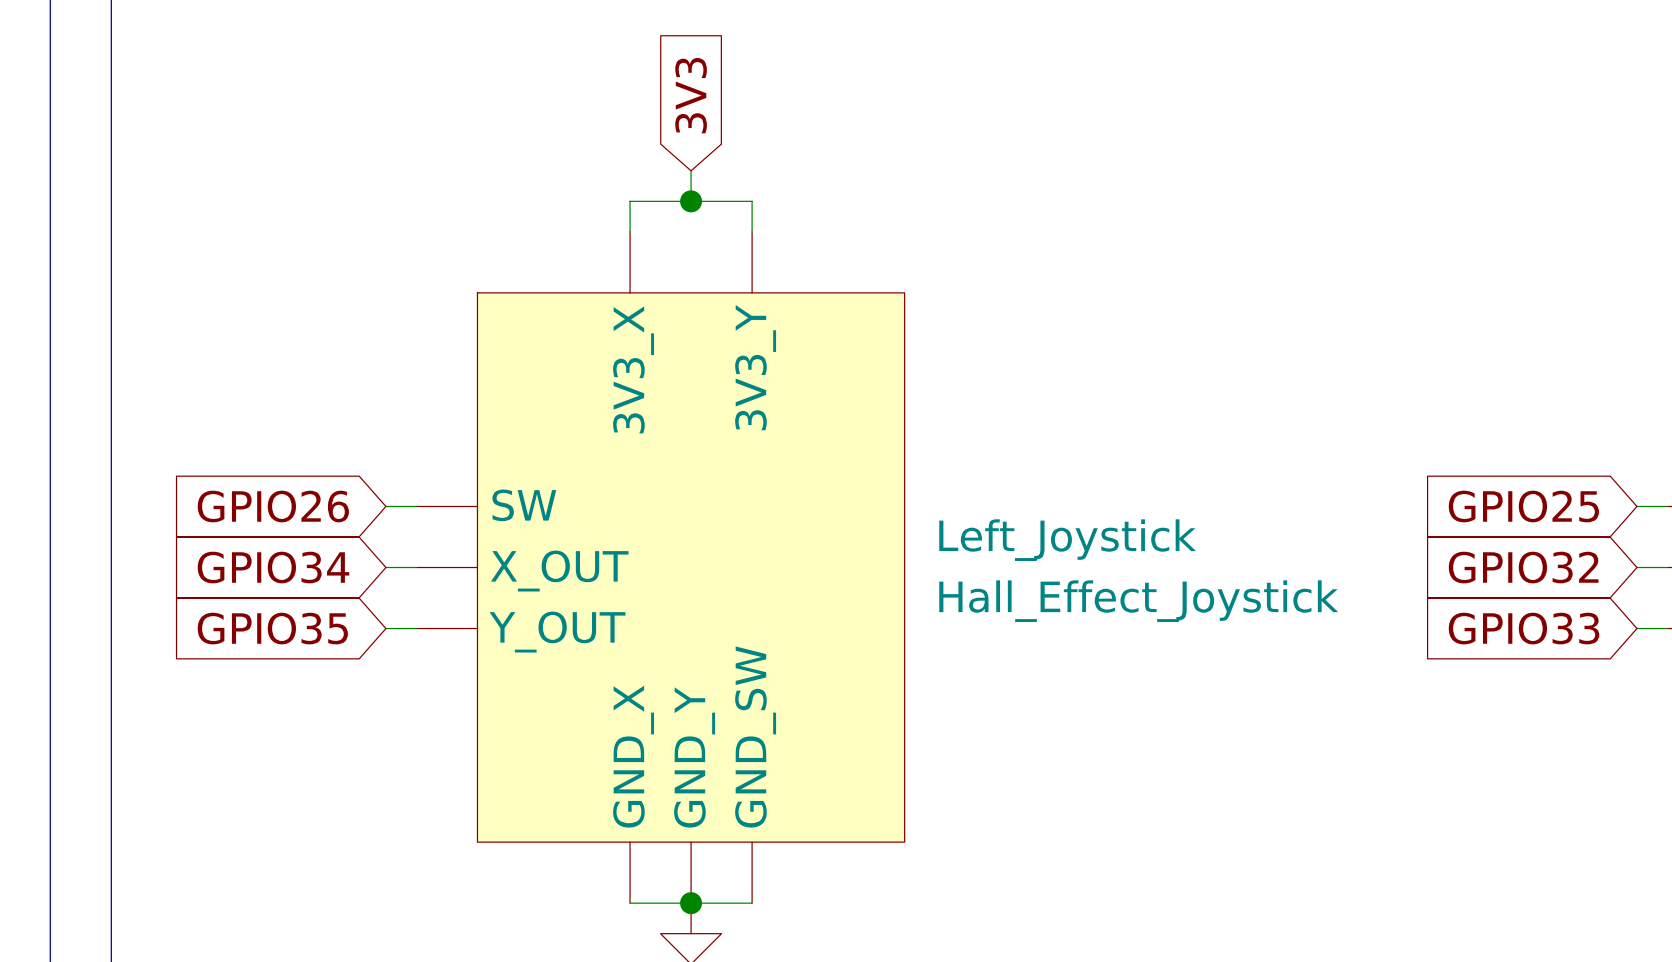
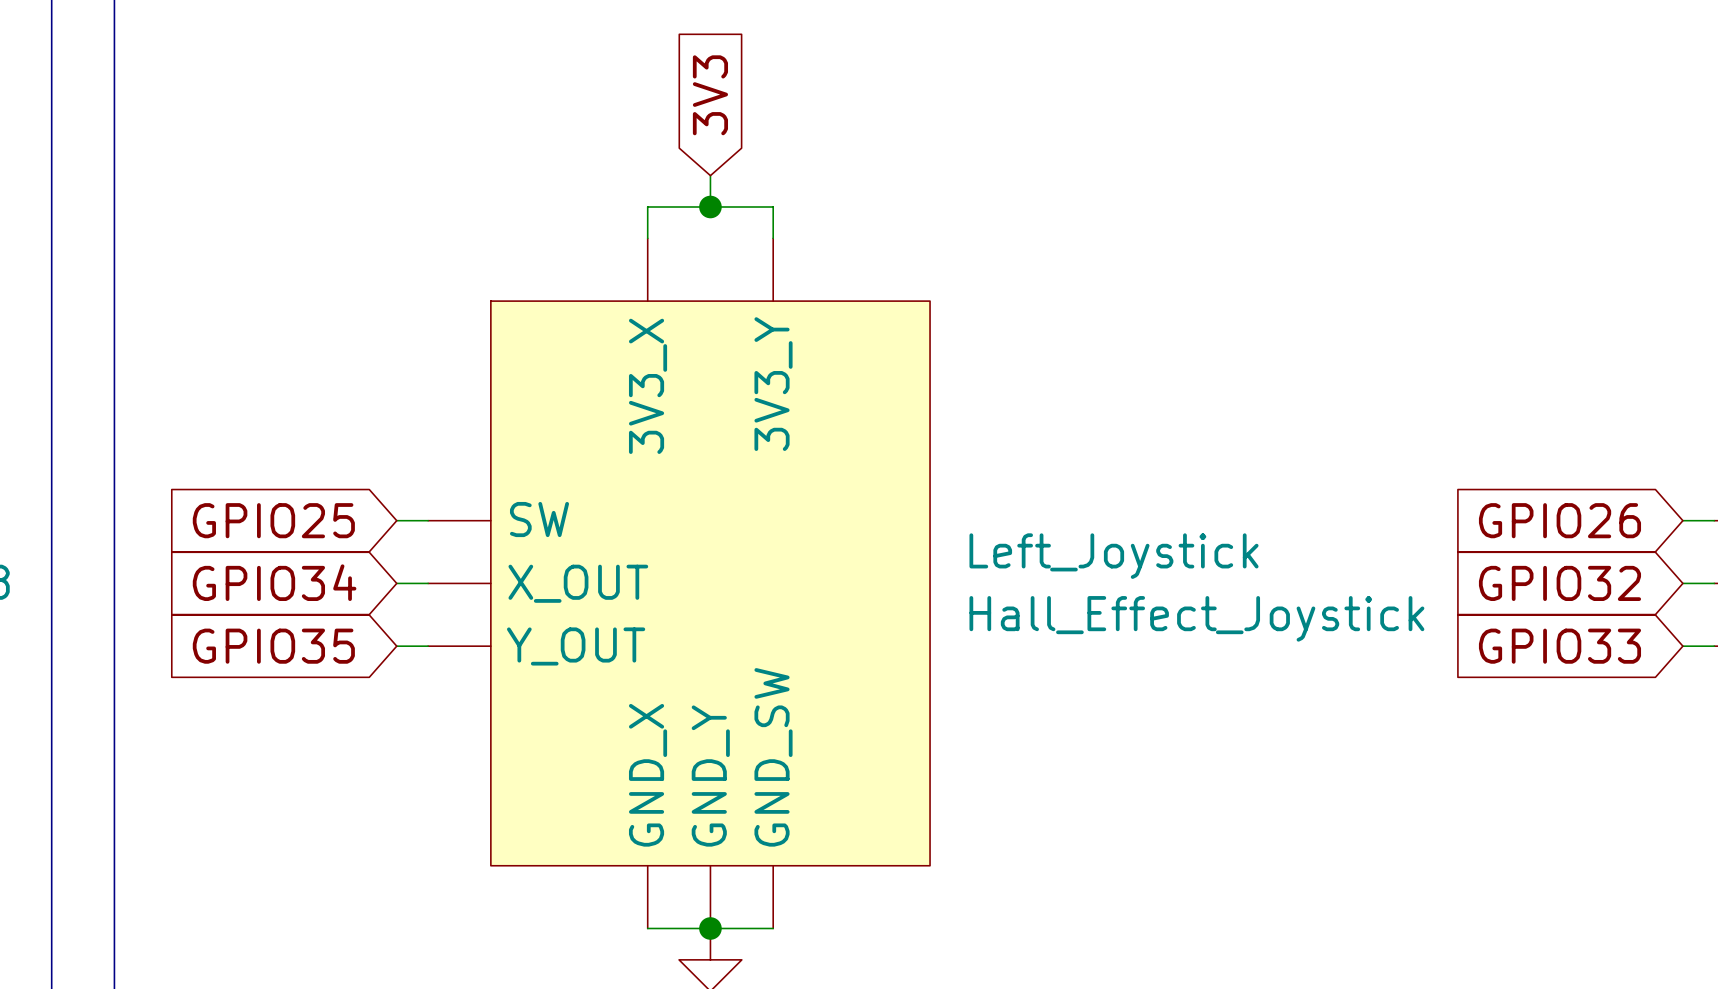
global label: GPIO26 (273, 506) -> GPIO25 (273, 520)
global label: GPIO25 (1523, 506) -> GPIO26 (1559, 520)

